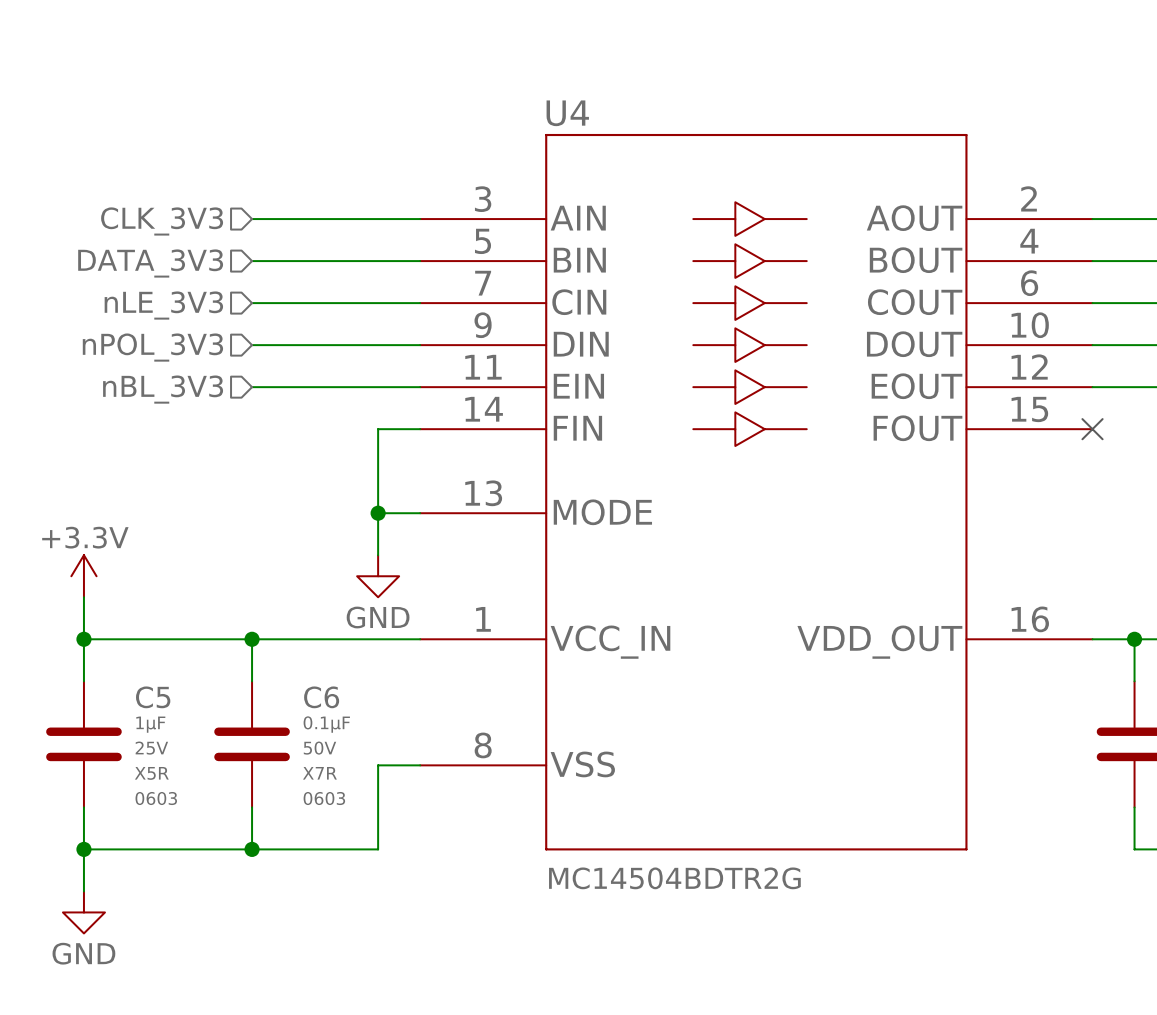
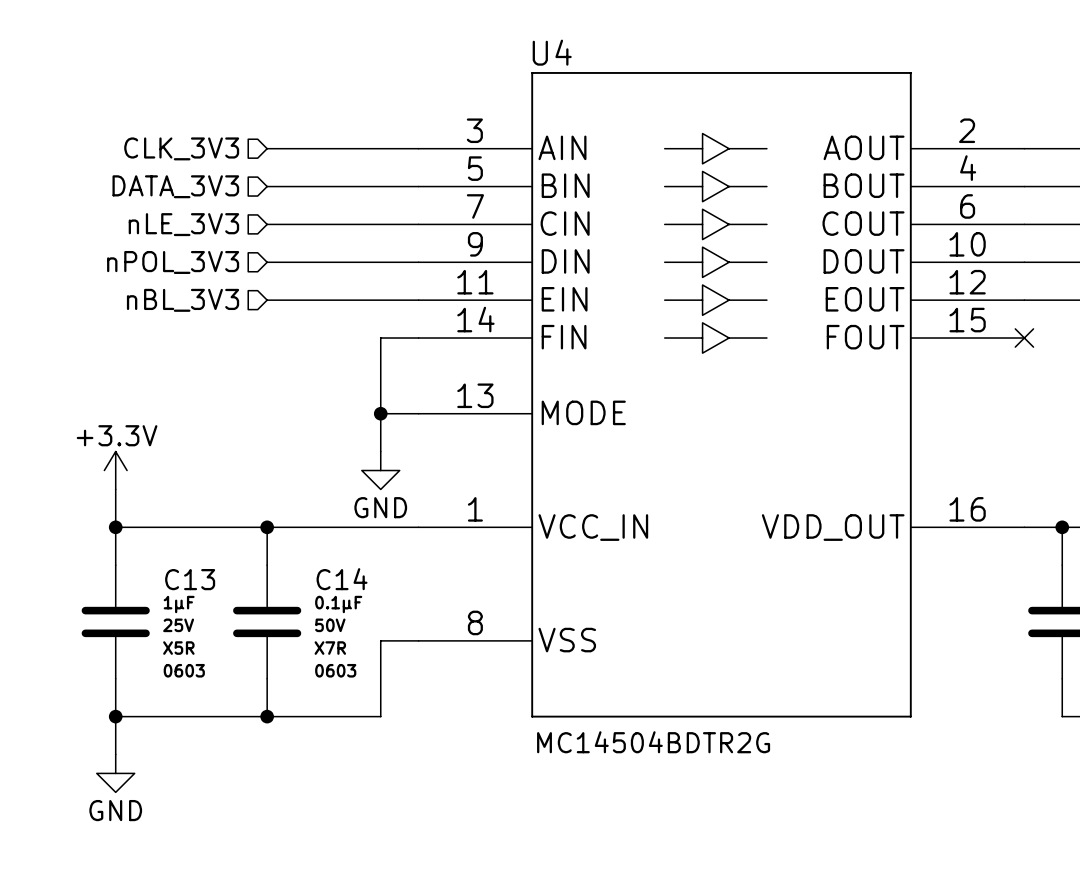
C5 name: C5 (153, 697) -> C13 (190, 579)
C6 name: C6 (321, 697) -> C14 (342, 579)

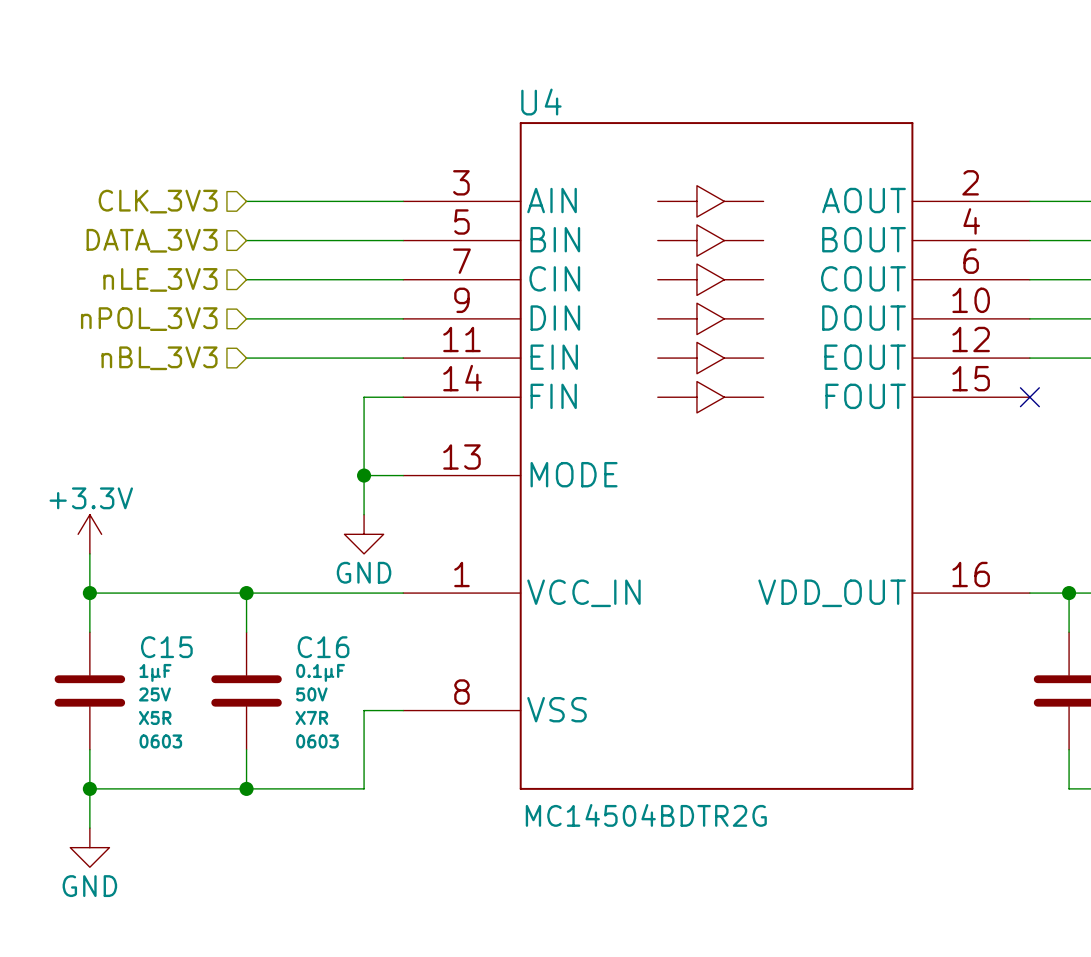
C13 name: C13 (190, 579) -> C15 (166, 647)
C14 name: C14 (342, 579) -> C16 (323, 647)

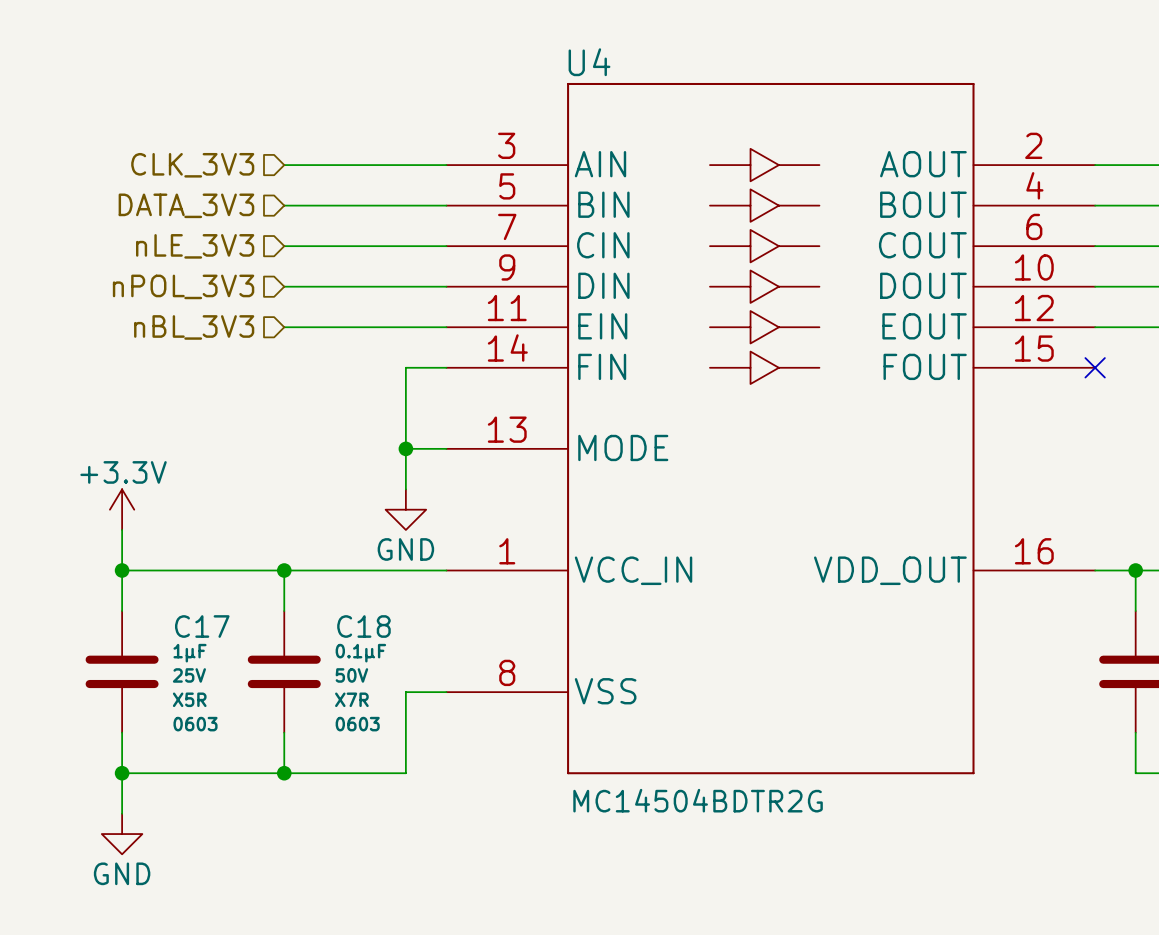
C15 name: C15 (166, 647) -> C17 (202, 626)
C16 name: C16 (323, 647) -> C18 (363, 626)

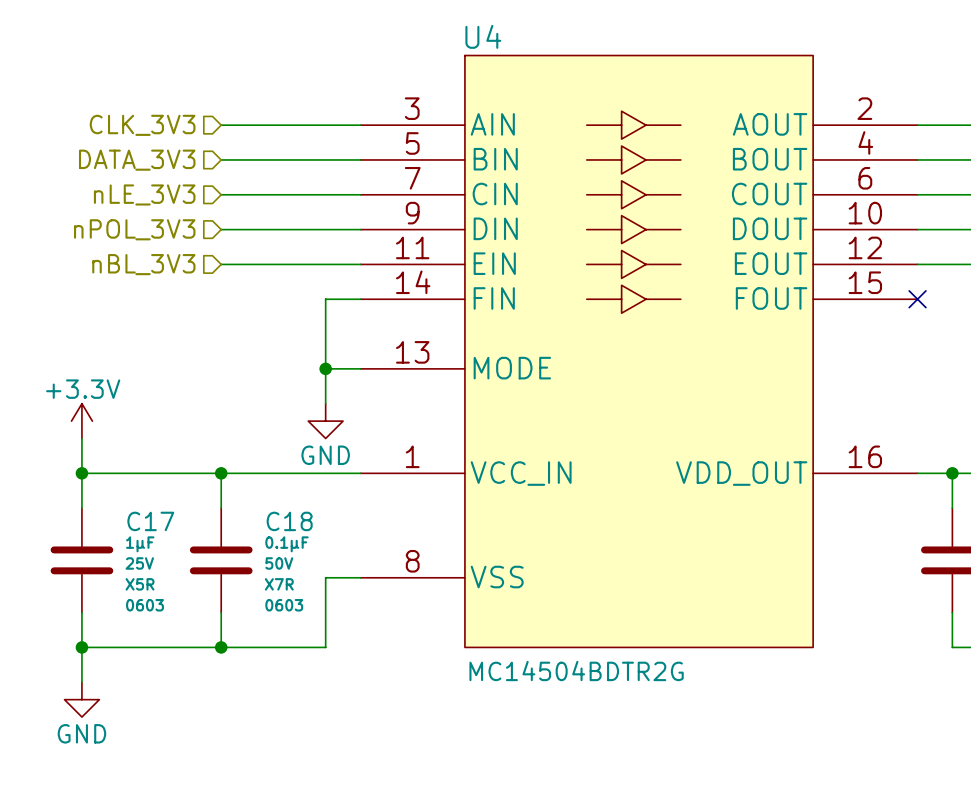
U4 symbol: [446, 82, 1096, 775] -> [360, 55, 918, 648]

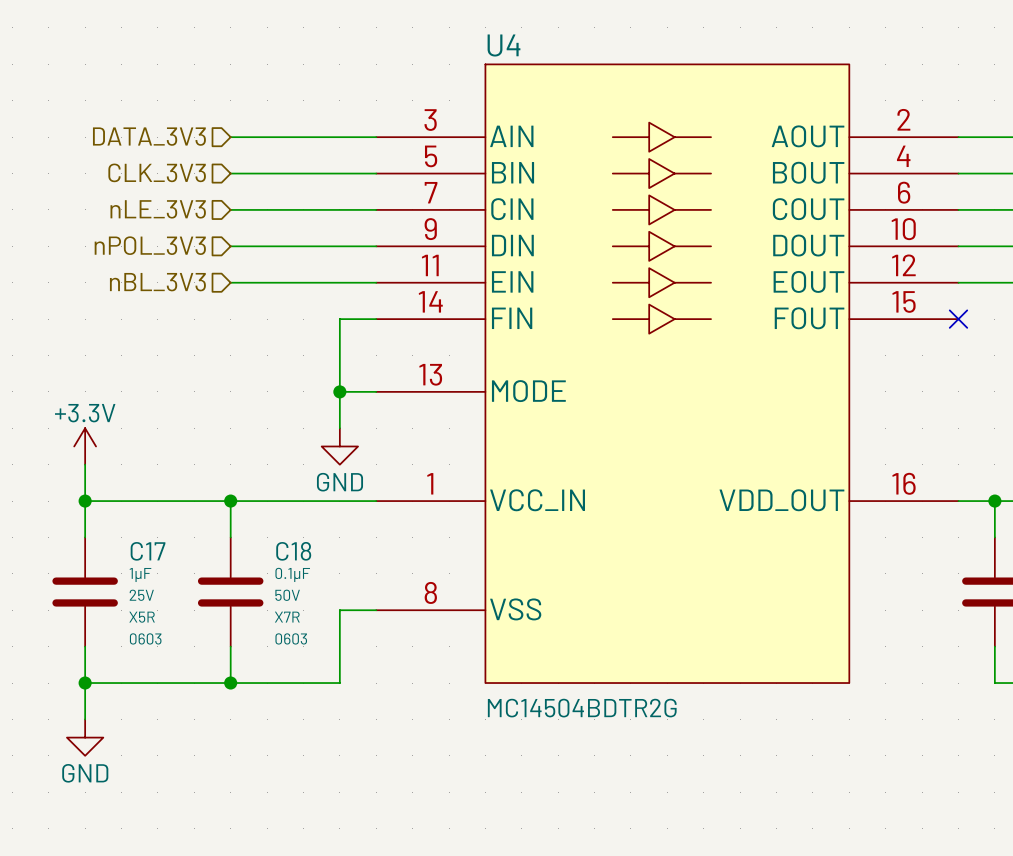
hierarchical label: CLK_3V3 (142, 125) -> DATA_3V3 (149, 136)
hierarchical label: DATA_3V3 (137, 160) -> CLK_3V3 (157, 172)

